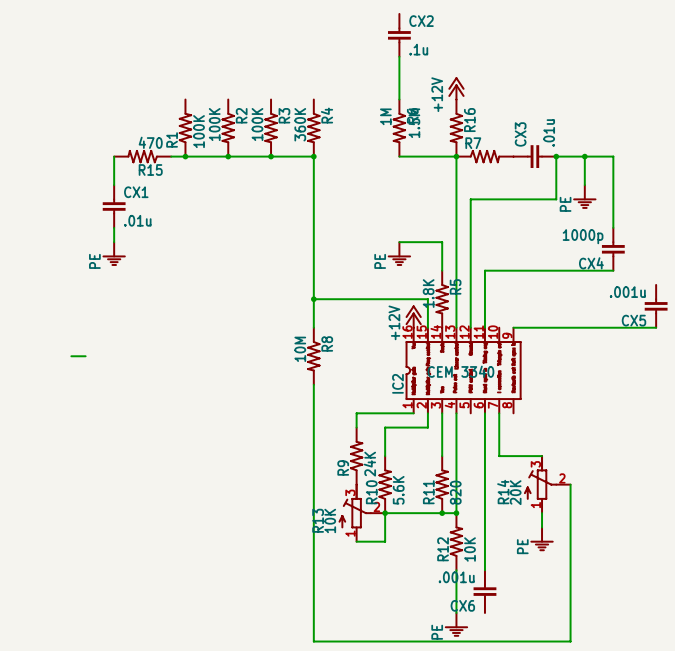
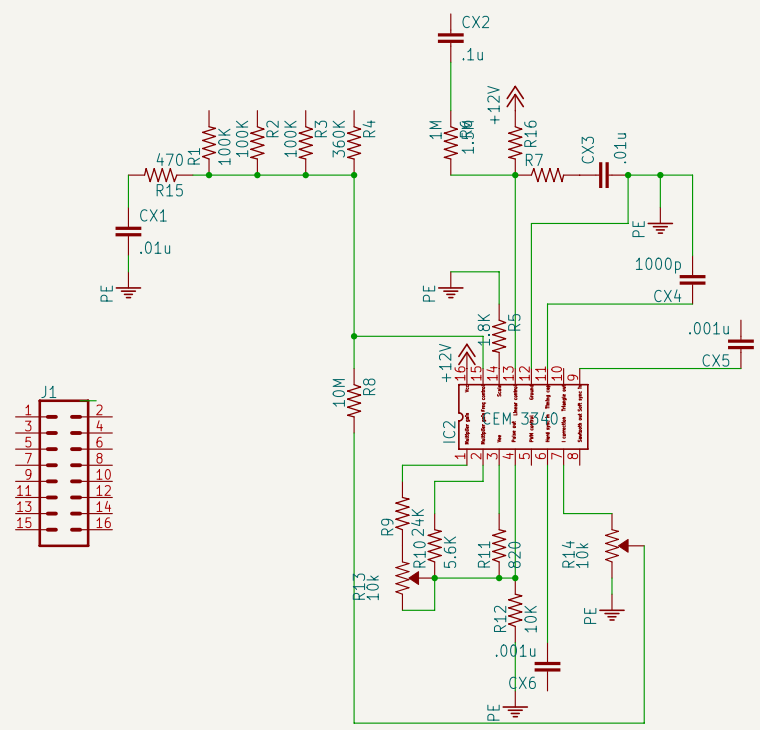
J1: none -> (63, 473)
R14 symbol: [524, 455, 571, 514] -> [605, 513, 645, 579]
R13 symbol: [339, 484, 386, 542] -> [395, 545, 435, 611]
R14 value: 20K (515, 492) -> 10k (582, 555)
R13 value: 10K (330, 520) -> 10k (372, 587)

